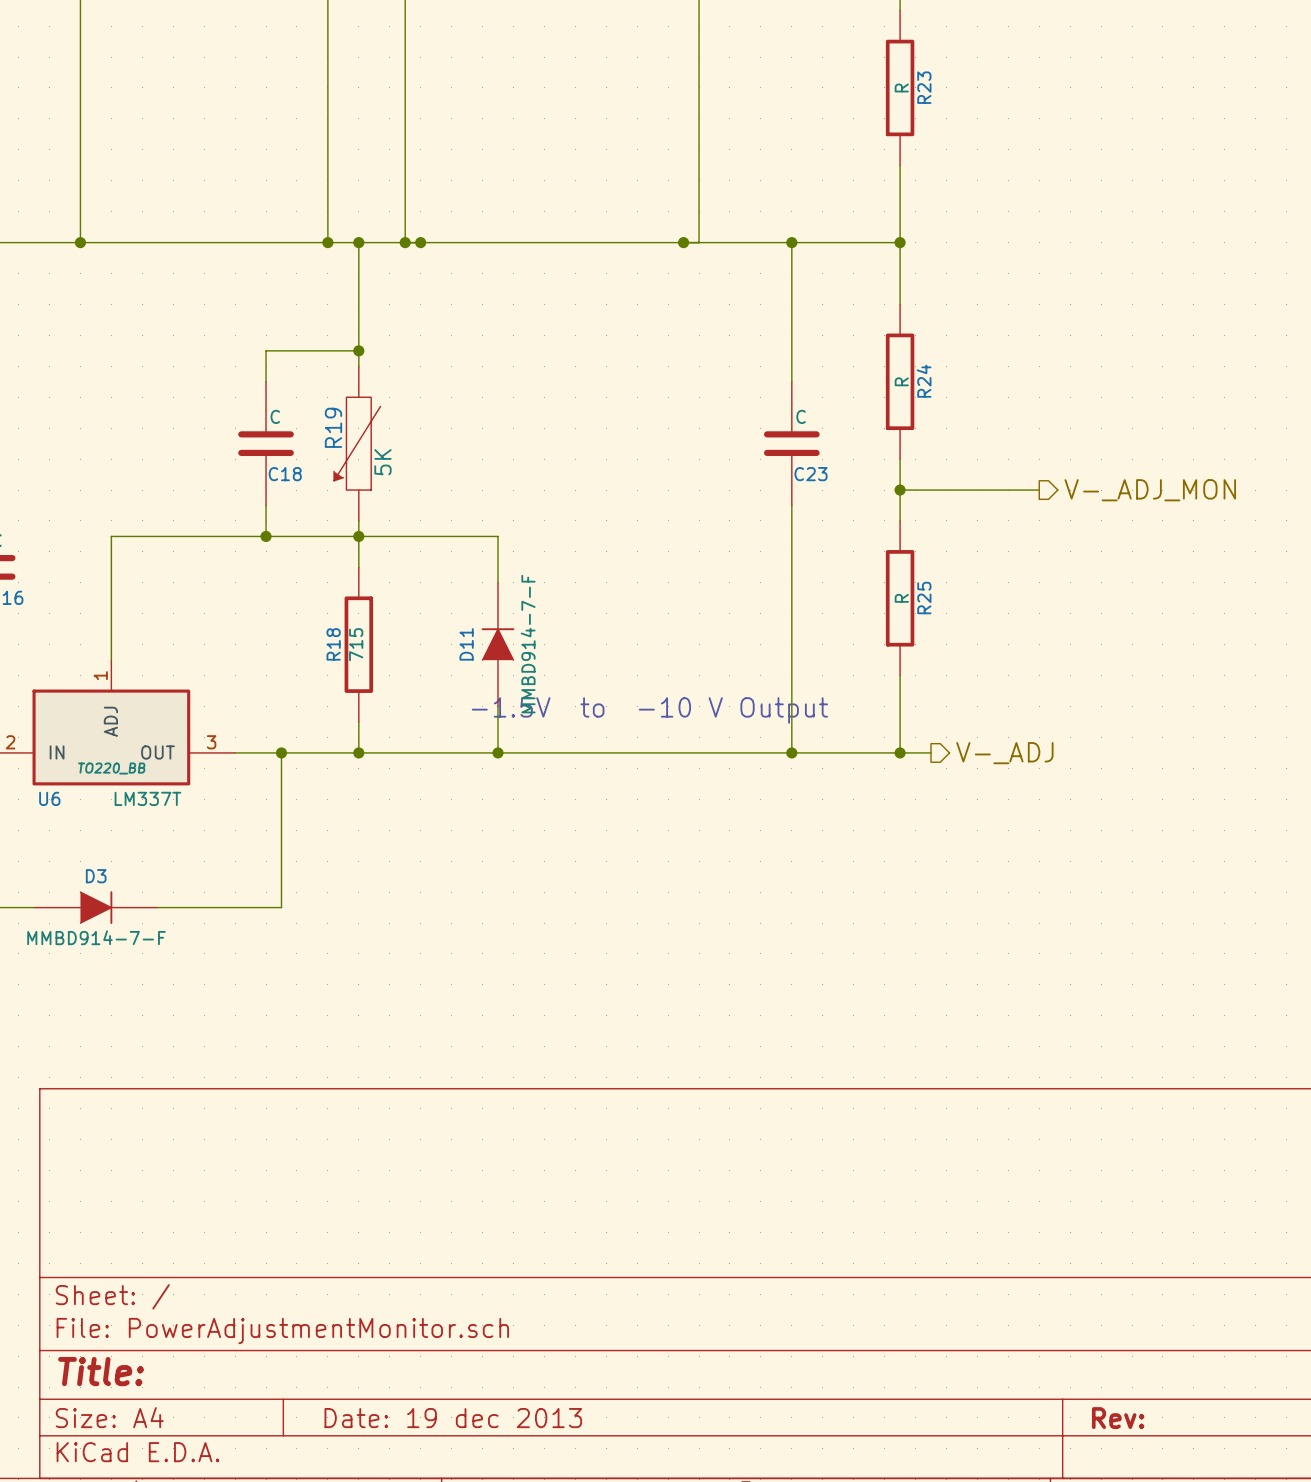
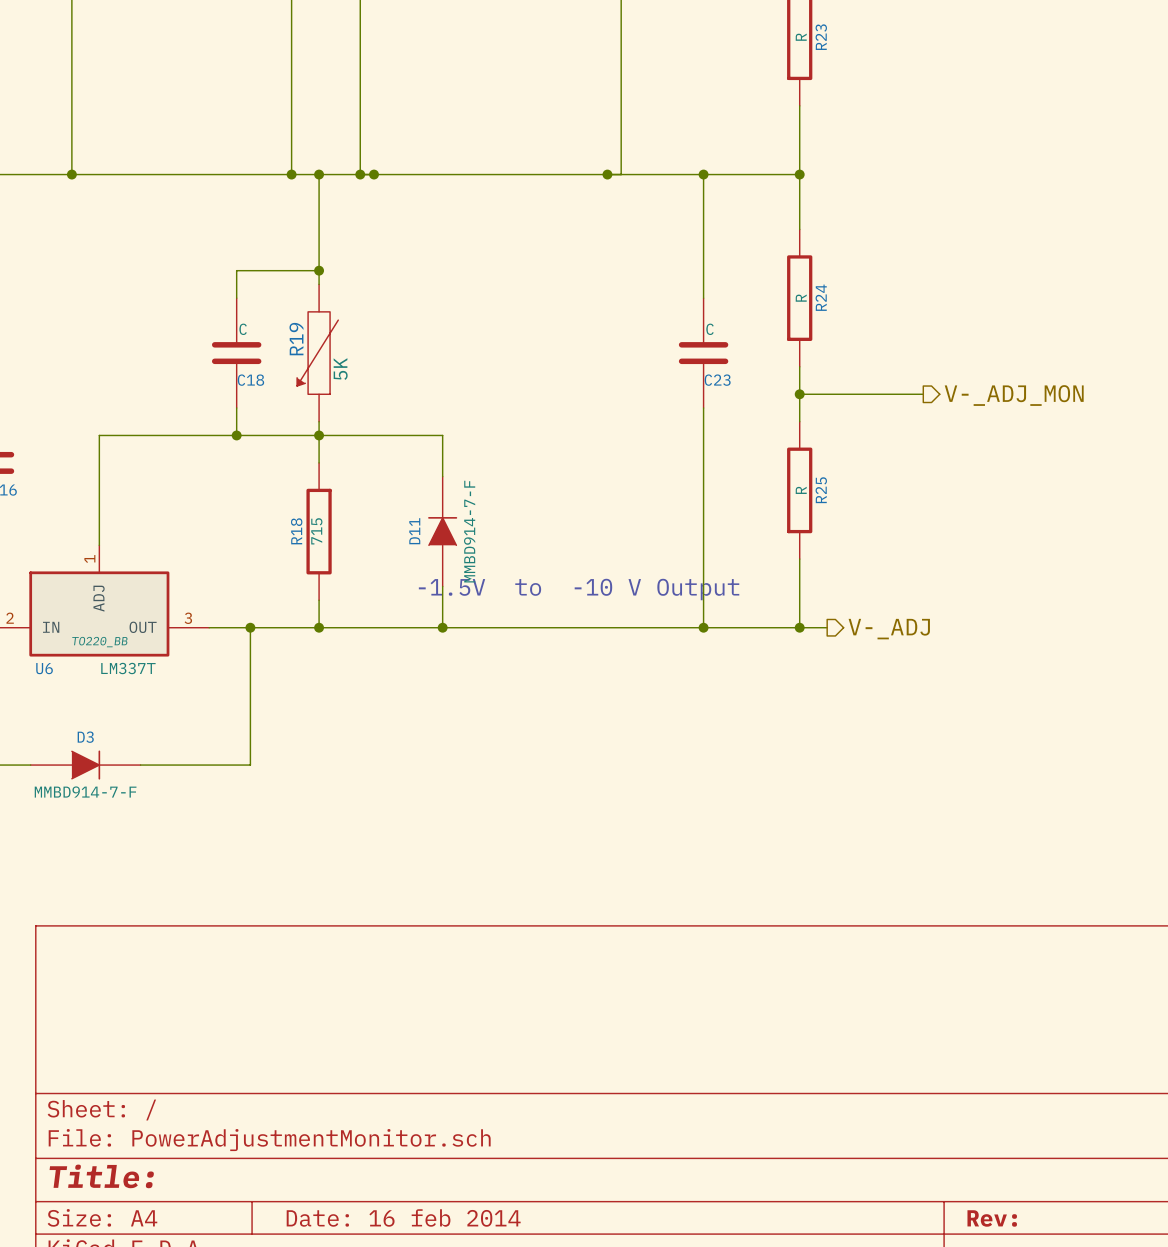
title block: Date: 19 dec 2013 (453, 1418) -> Date: 16 feb 2014 (403, 1217)

